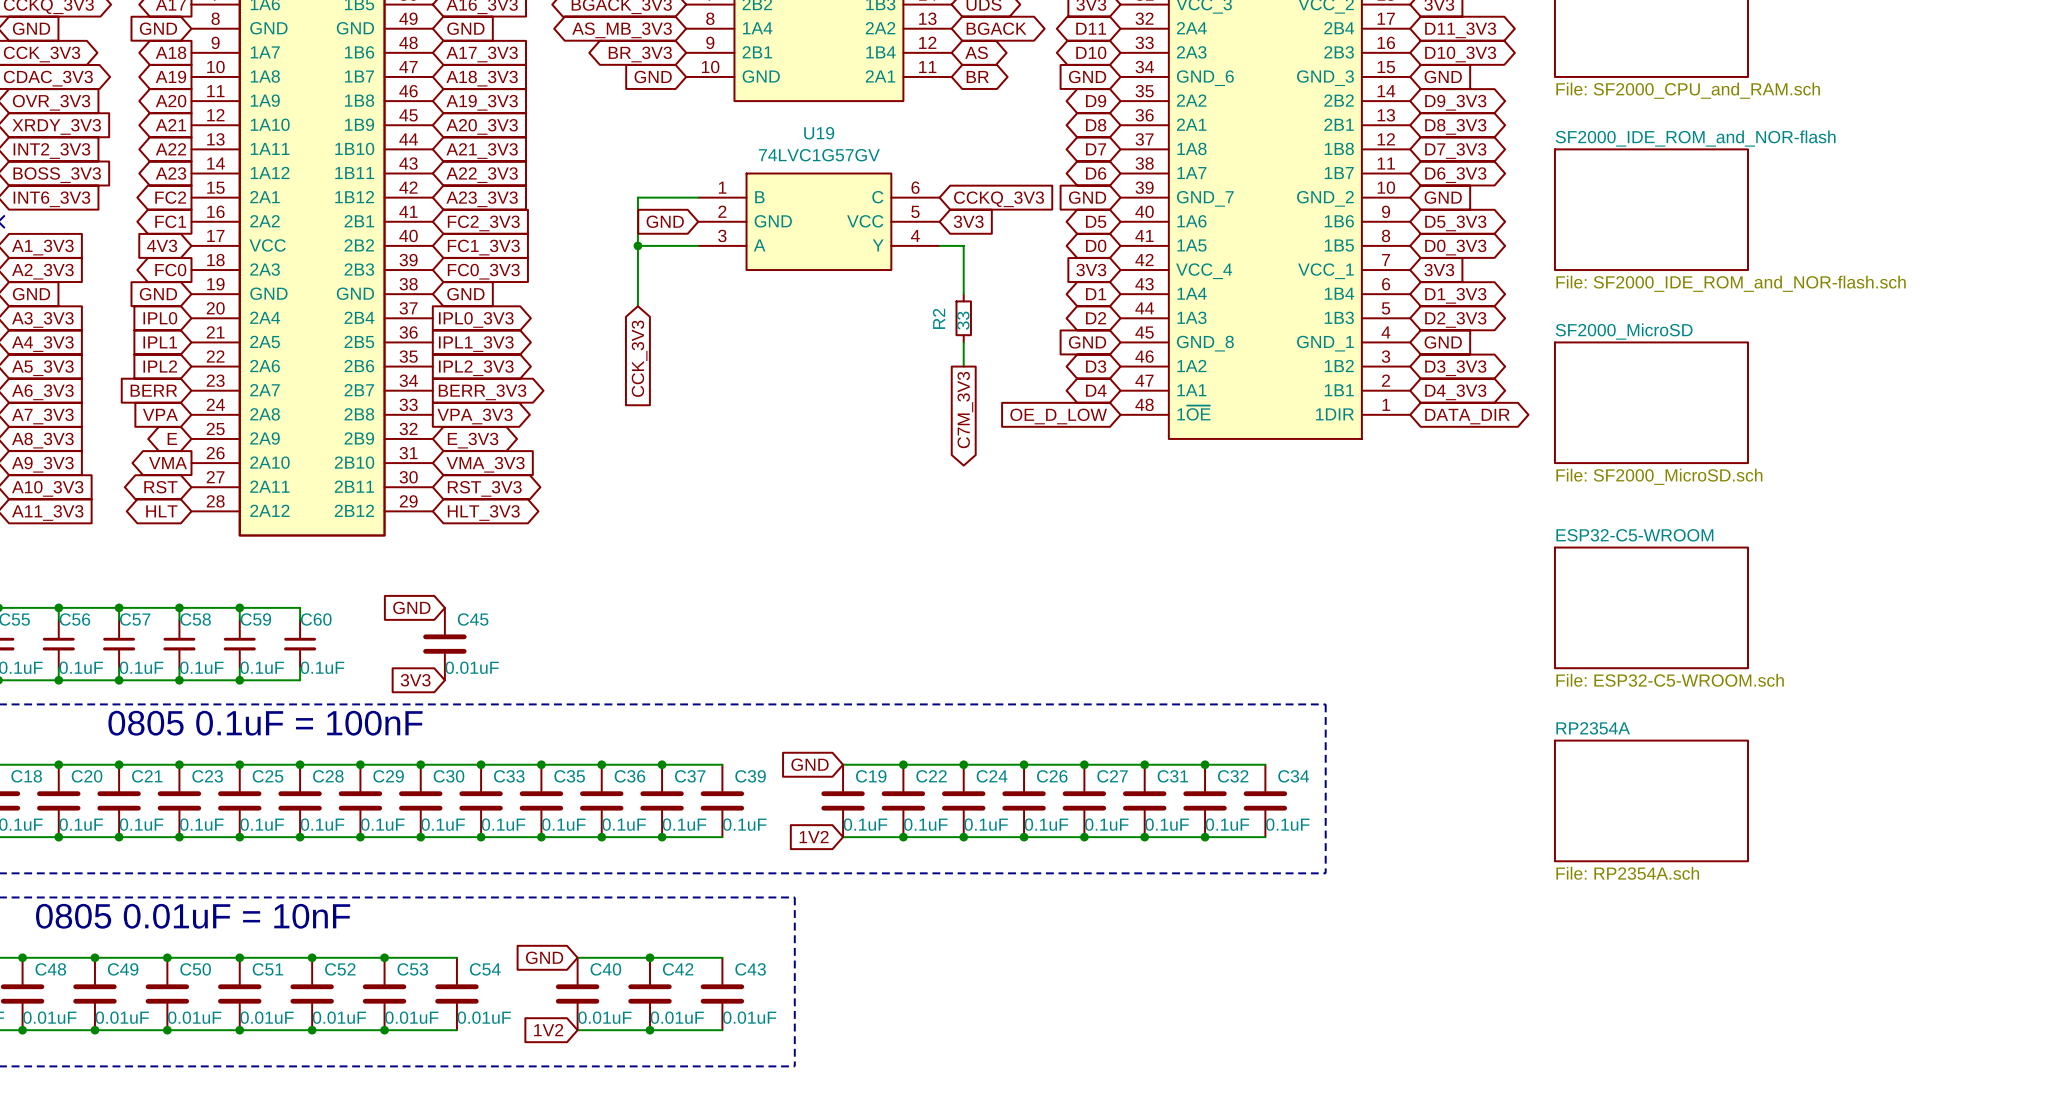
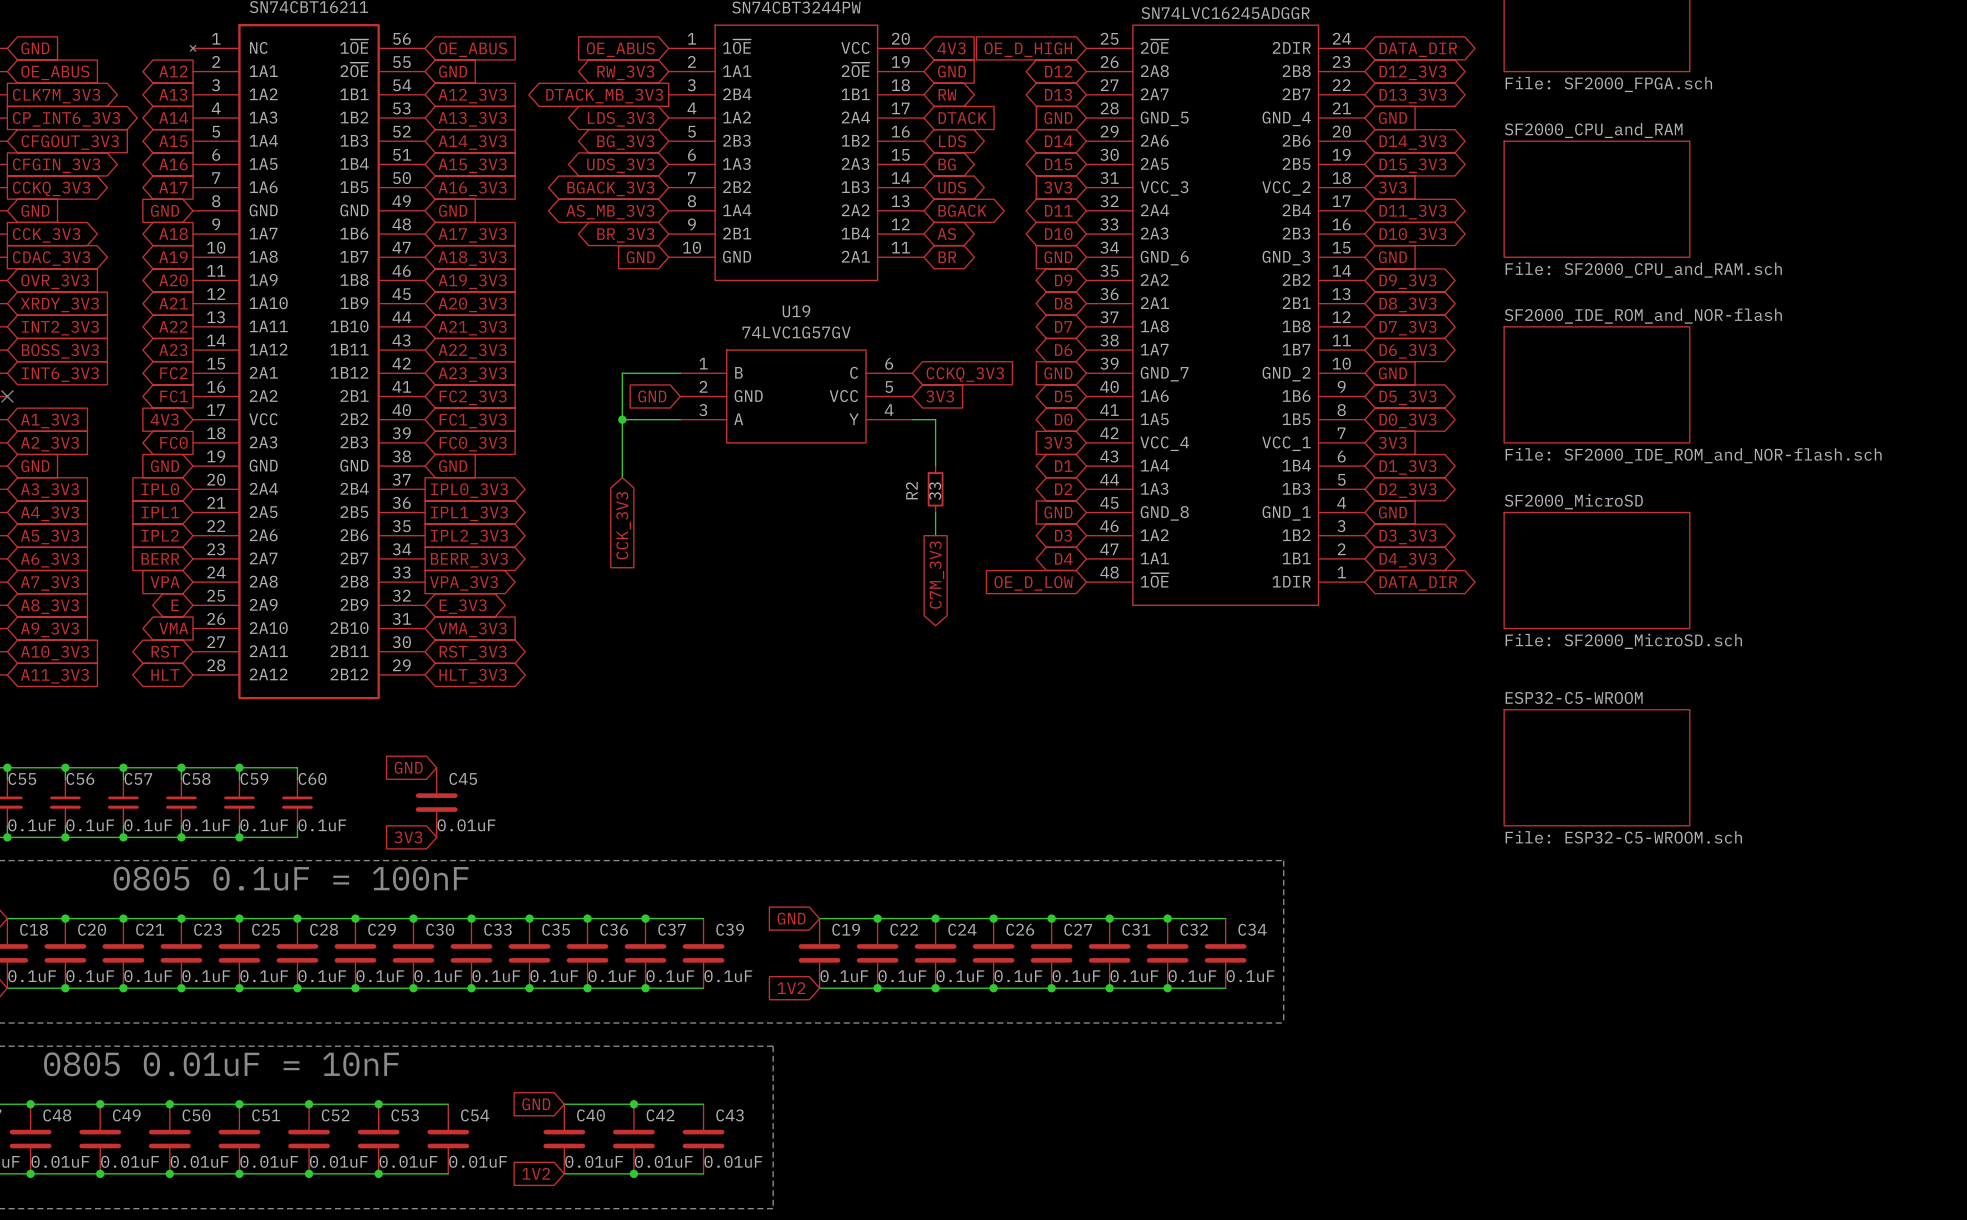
sheet RP2354A: File: RP2354A.sch (1651, 800) -> none

